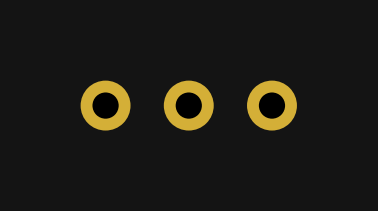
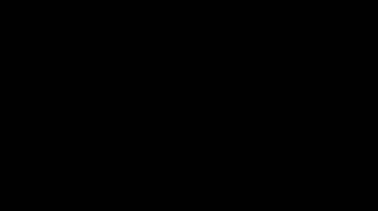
part: (188, 105) -> none

